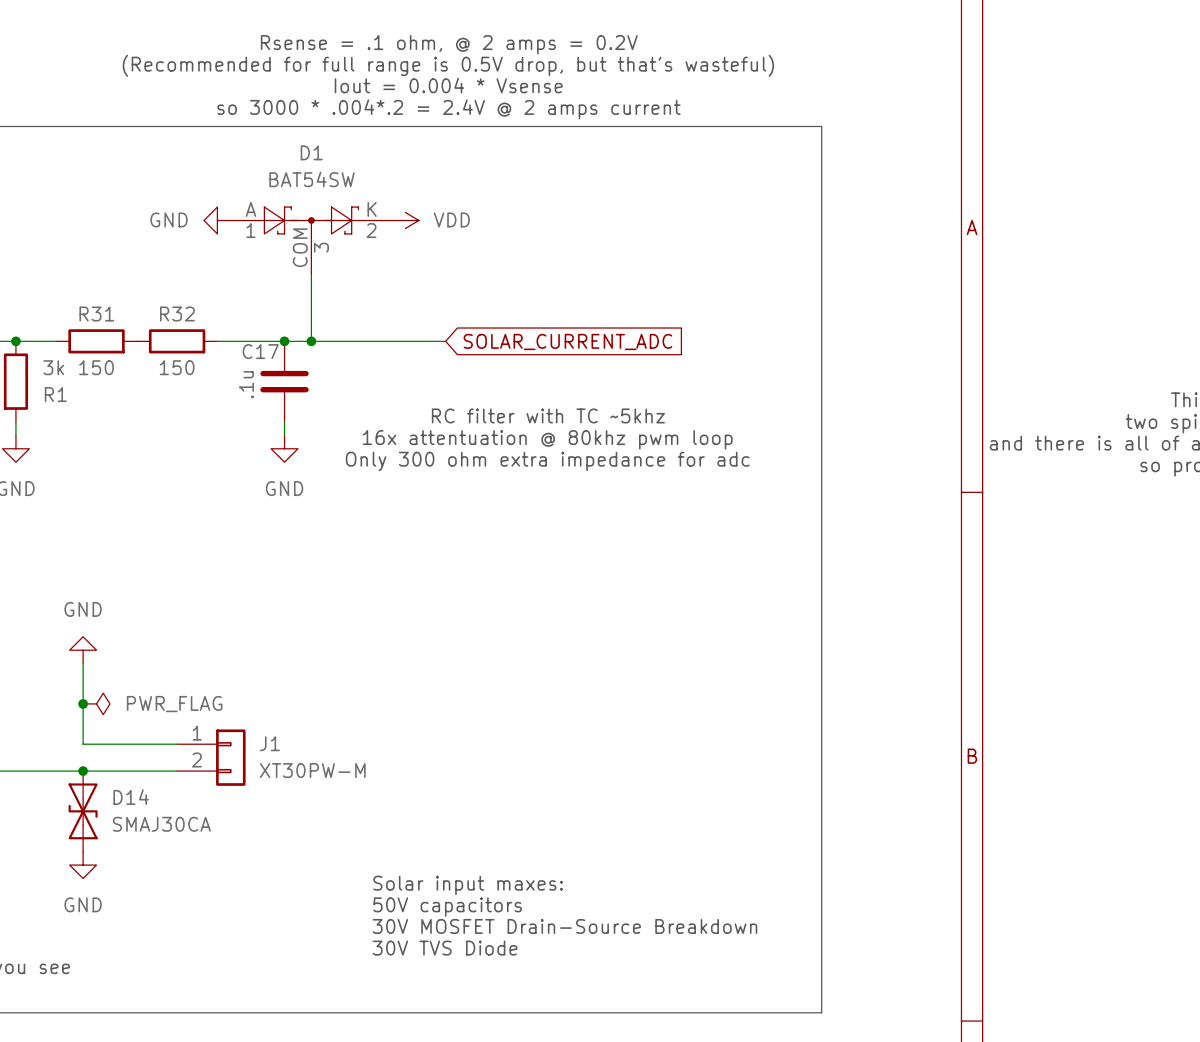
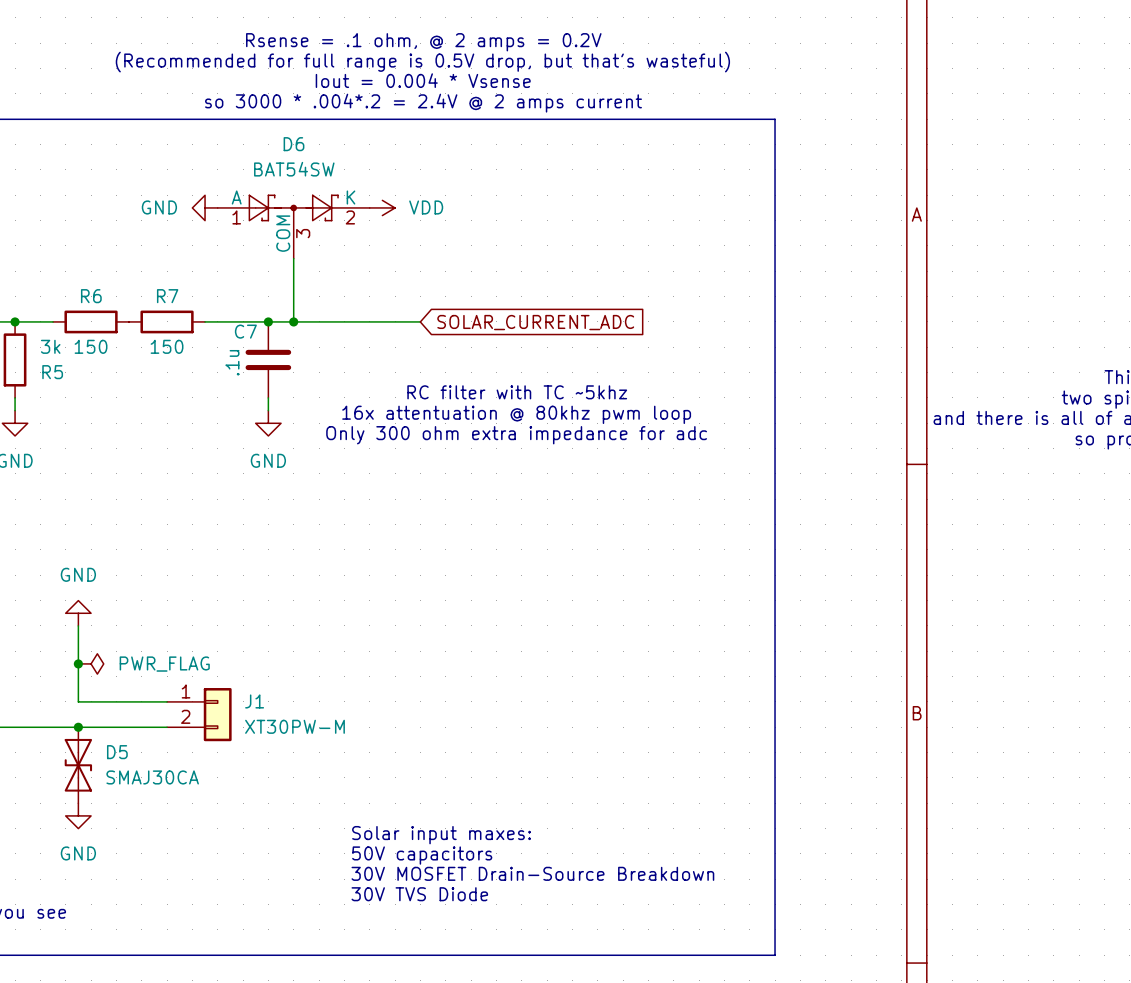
D1 name: D1 (311, 152) -> D6 (294, 144)
R31 name: R31 (96, 313) -> R6 (91, 296)
R32 name: R32 (177, 313) -> R7 (167, 296)
C17 name: C17 (260, 351) -> C7 (245, 331)
R1 name: R1 (55, 394) -> R5 (52, 372)
D14 name: D14 (131, 797) -> D5 (117, 752)

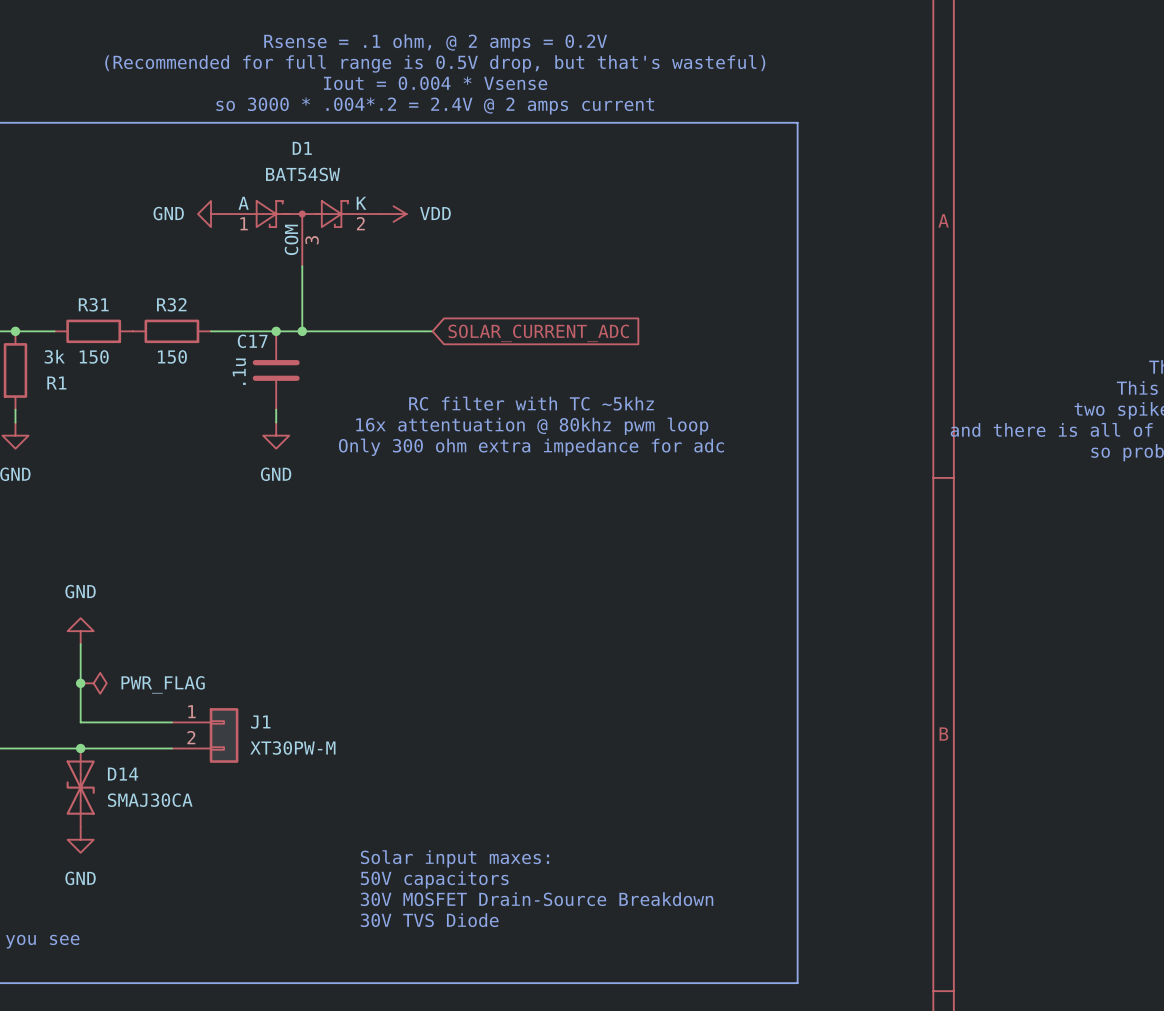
D6 name: D6 (294, 144) -> D1 (302, 148)
R6 name: R6 (91, 296) -> R31 (93, 304)
R7 name: R7 (167, 296) -> R32 (171, 304)
C7 name: C7 (245, 331) -> C17 (252, 341)
R5 name: R5 (52, 372) -> R1 (56, 383)
D5 name: D5 (117, 752) -> D14 (123, 774)

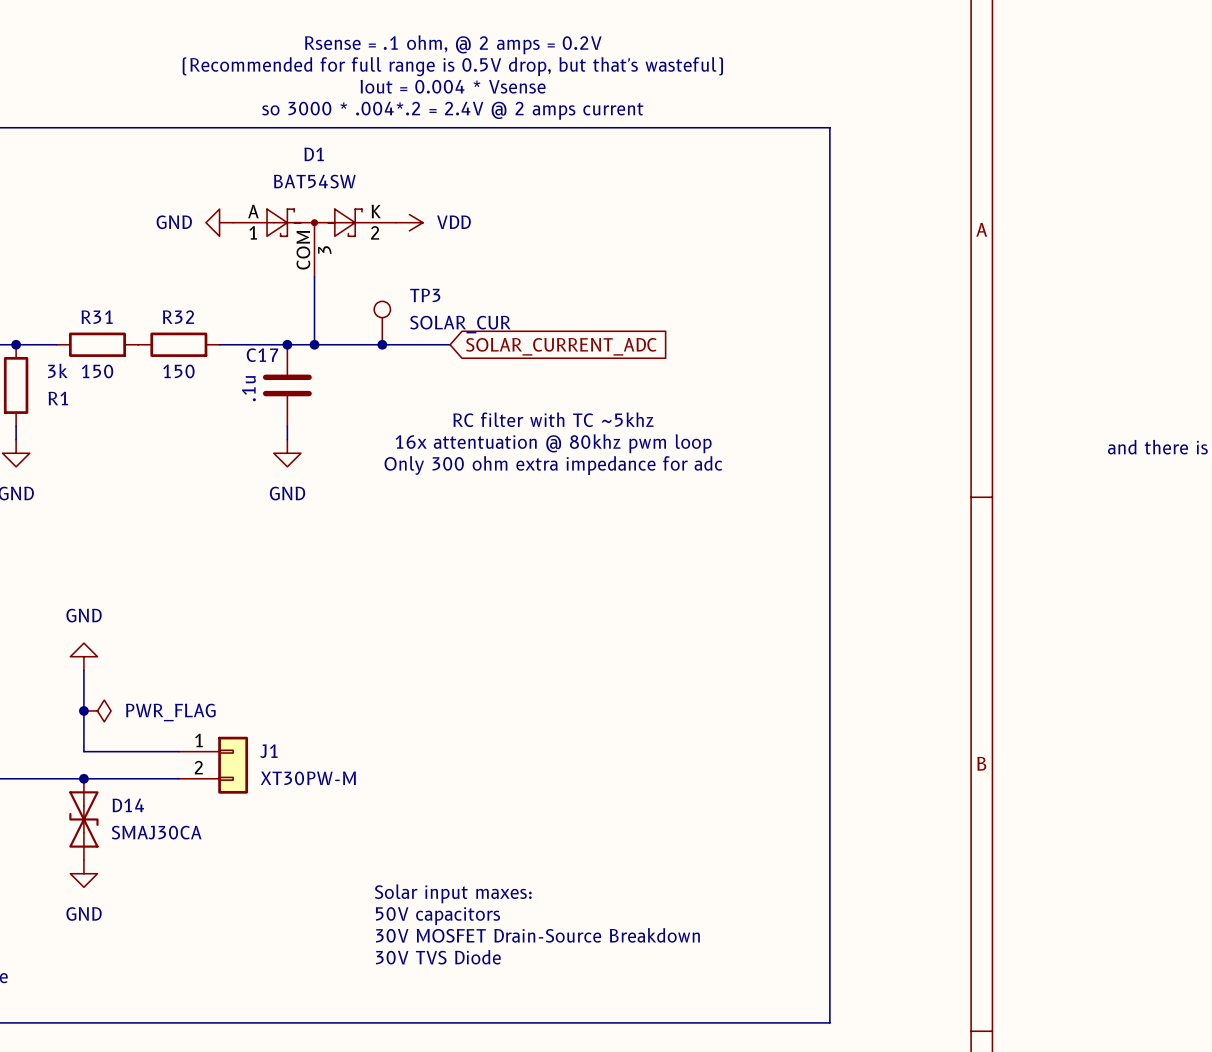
TP3: none -> SOLAR_CUR (382, 323)
junction: none -> (382, 344)

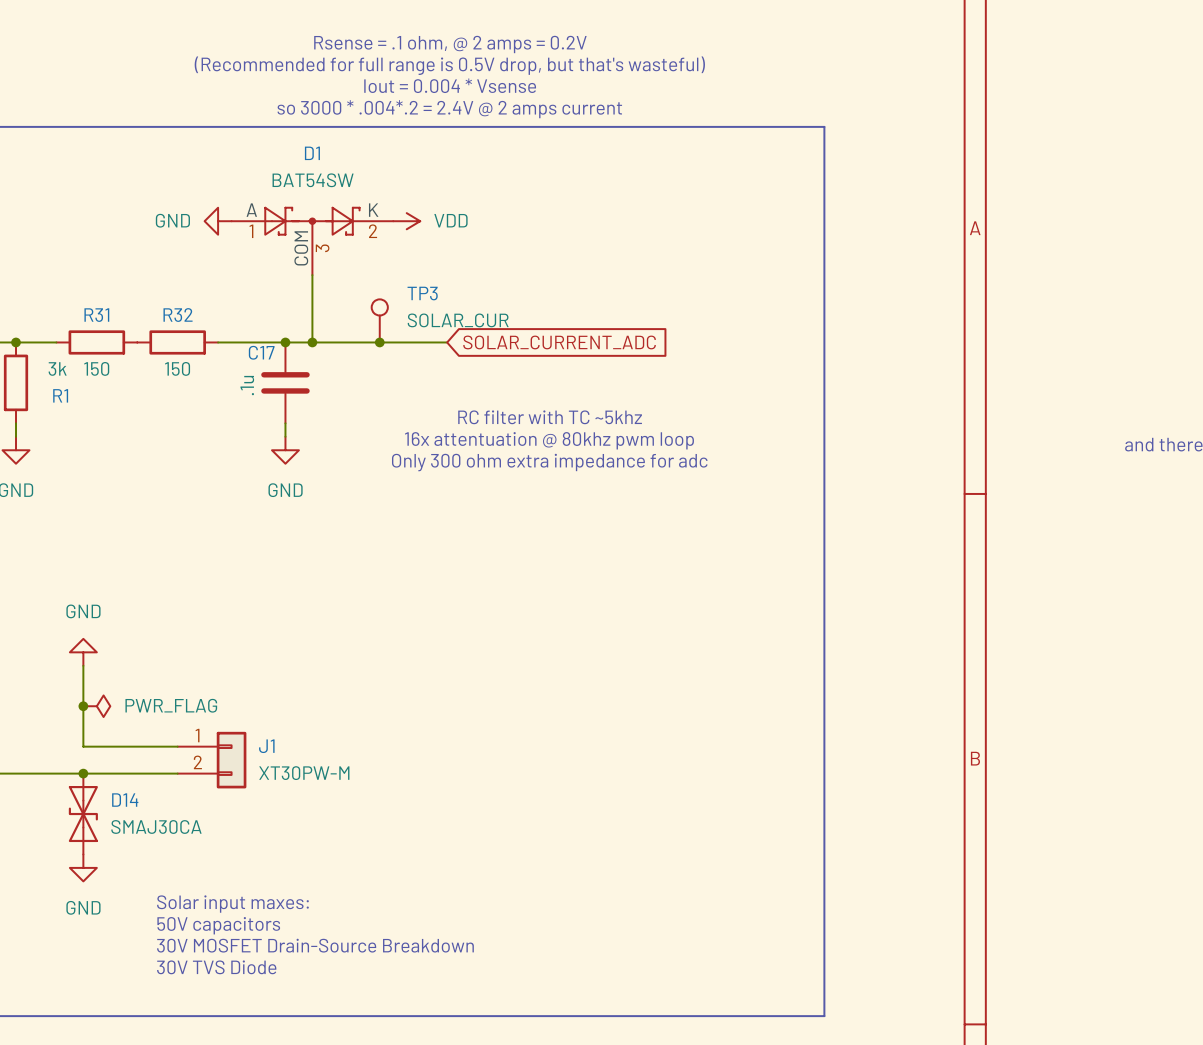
text position: Solar input maxes: (453, 893) -> Solar input maxes: (232, 904)
text position: 50V capacitors (438, 916) -> 50V capacitors (218, 925)
text position: 30V MOSFET Drain-Source Breakdown (537, 935) -> 30V MOSFET Drain-Source Breakdown (315, 945)
text position: 30V TVS Diode (438, 957) -> 30V TVS Diode (216, 967)

